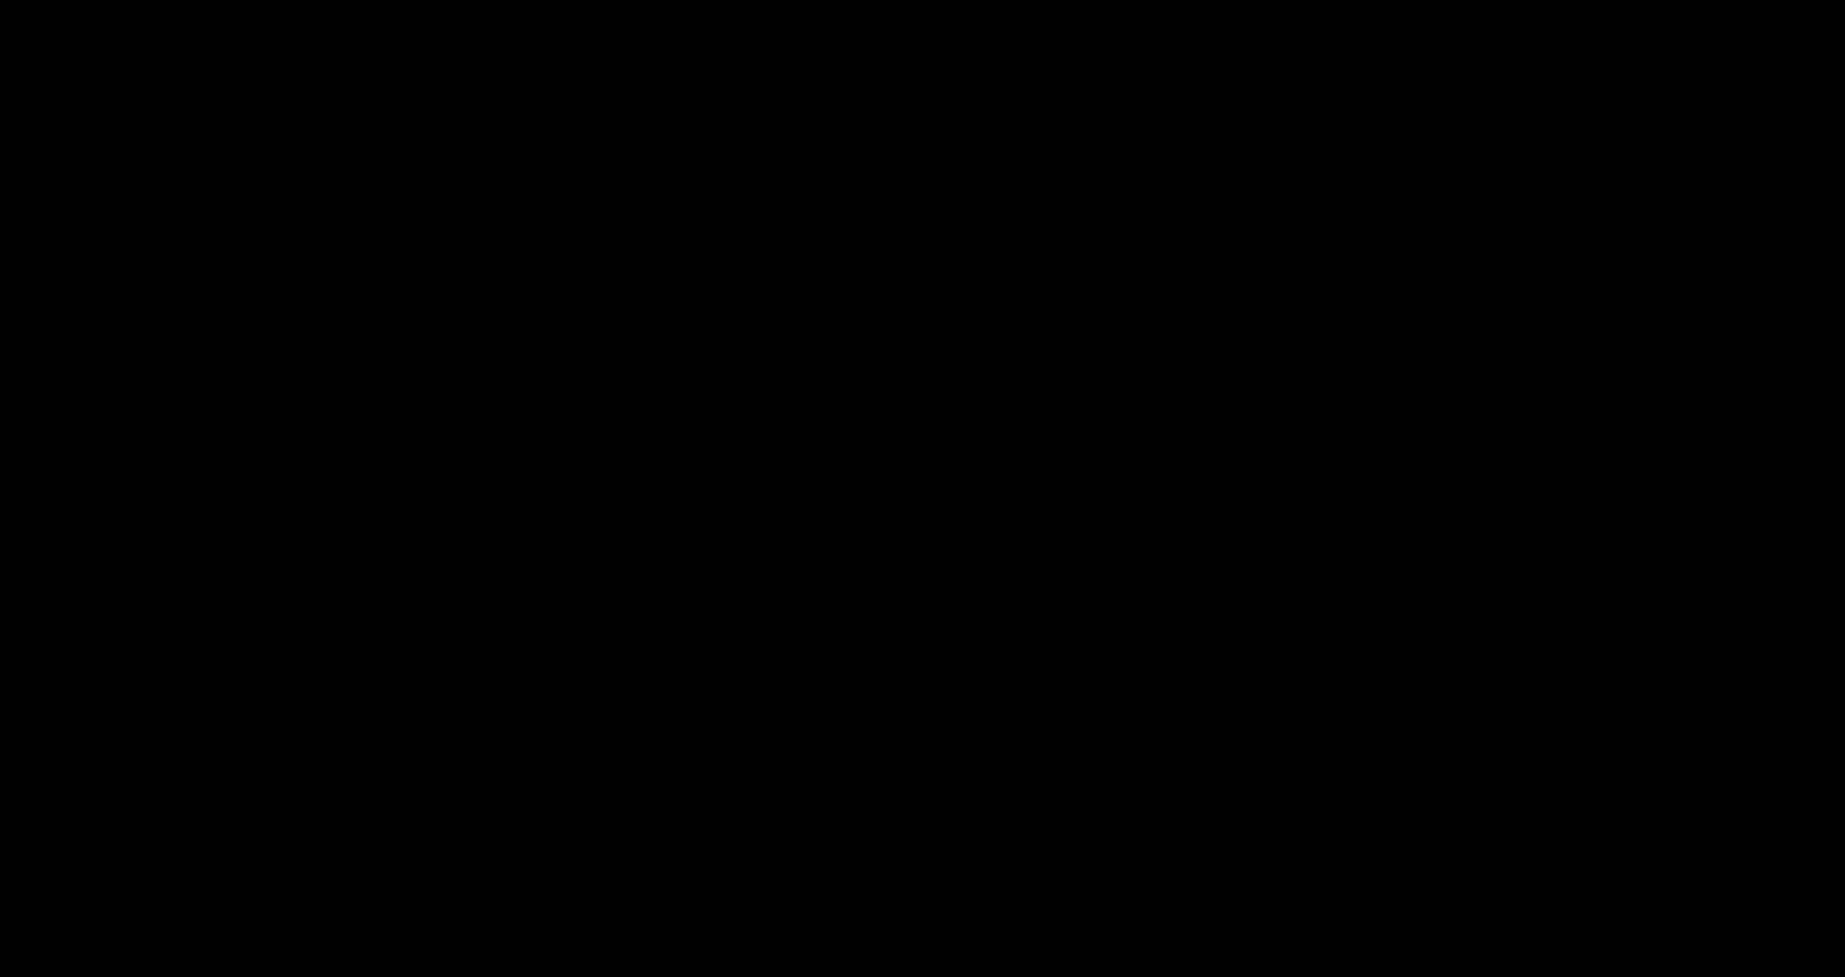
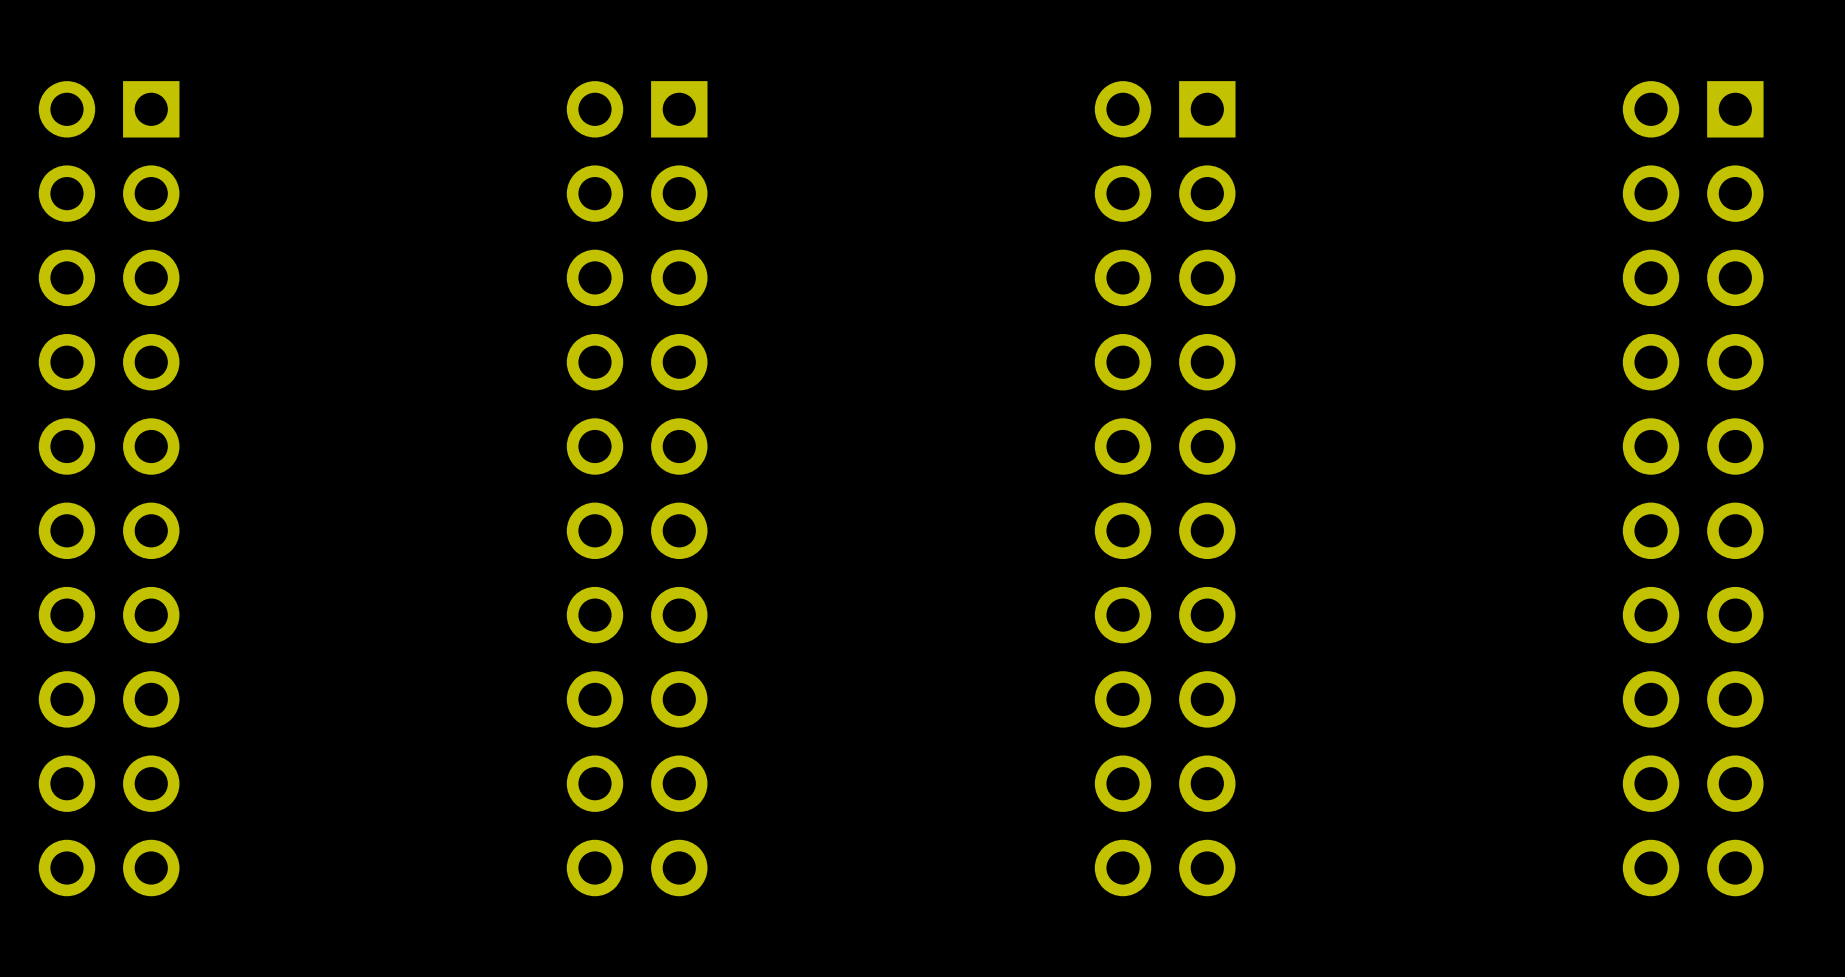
part: none -> (109, 488)
part: none -> (637, 488)
part: none -> (1165, 488)
part: none -> (1693, 488)

